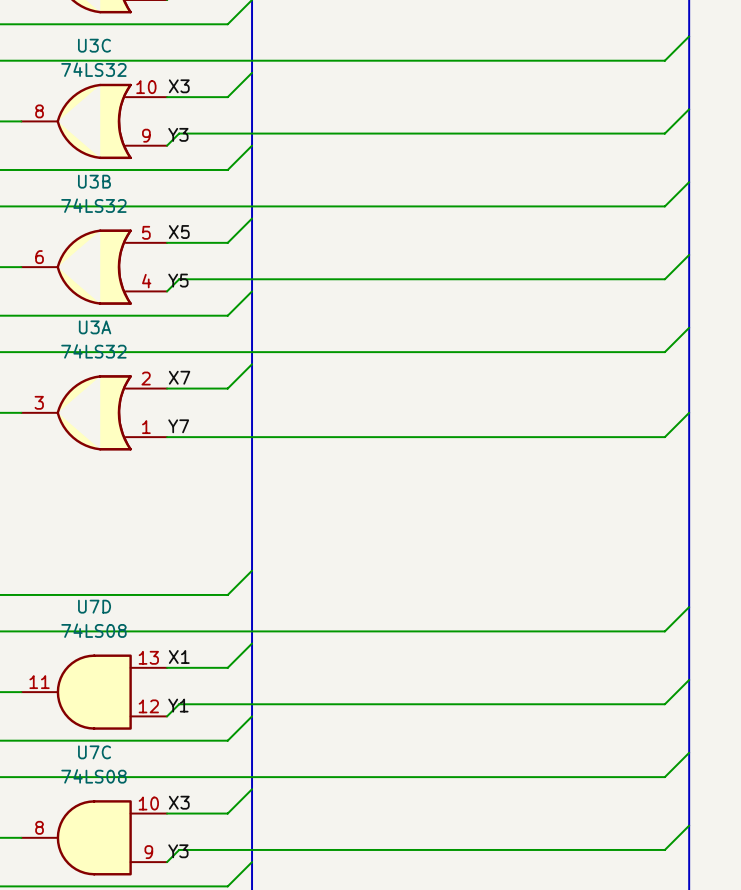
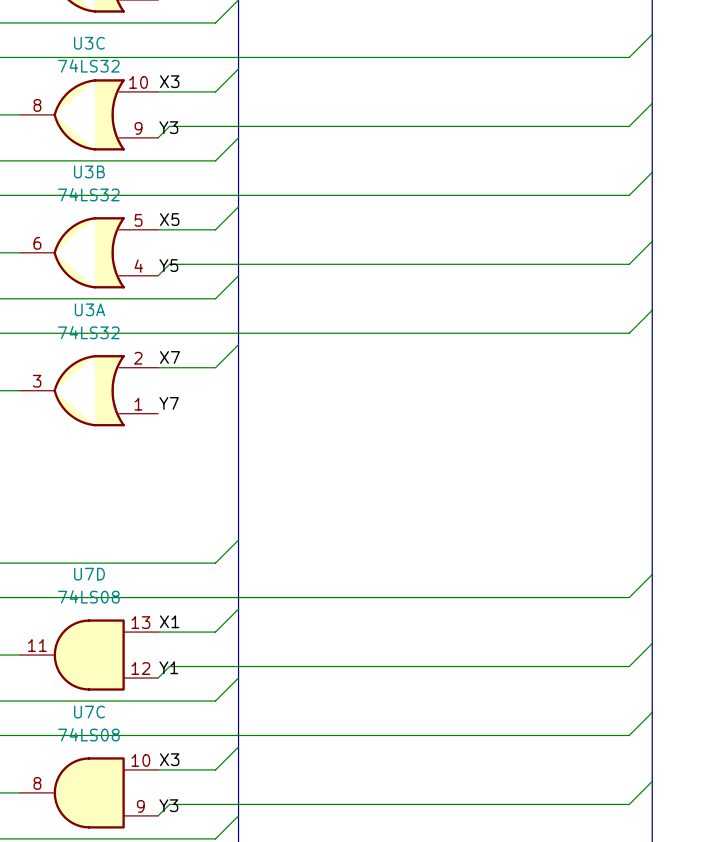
wire: (689, 412) (664, 437) (167, 437) -> none

